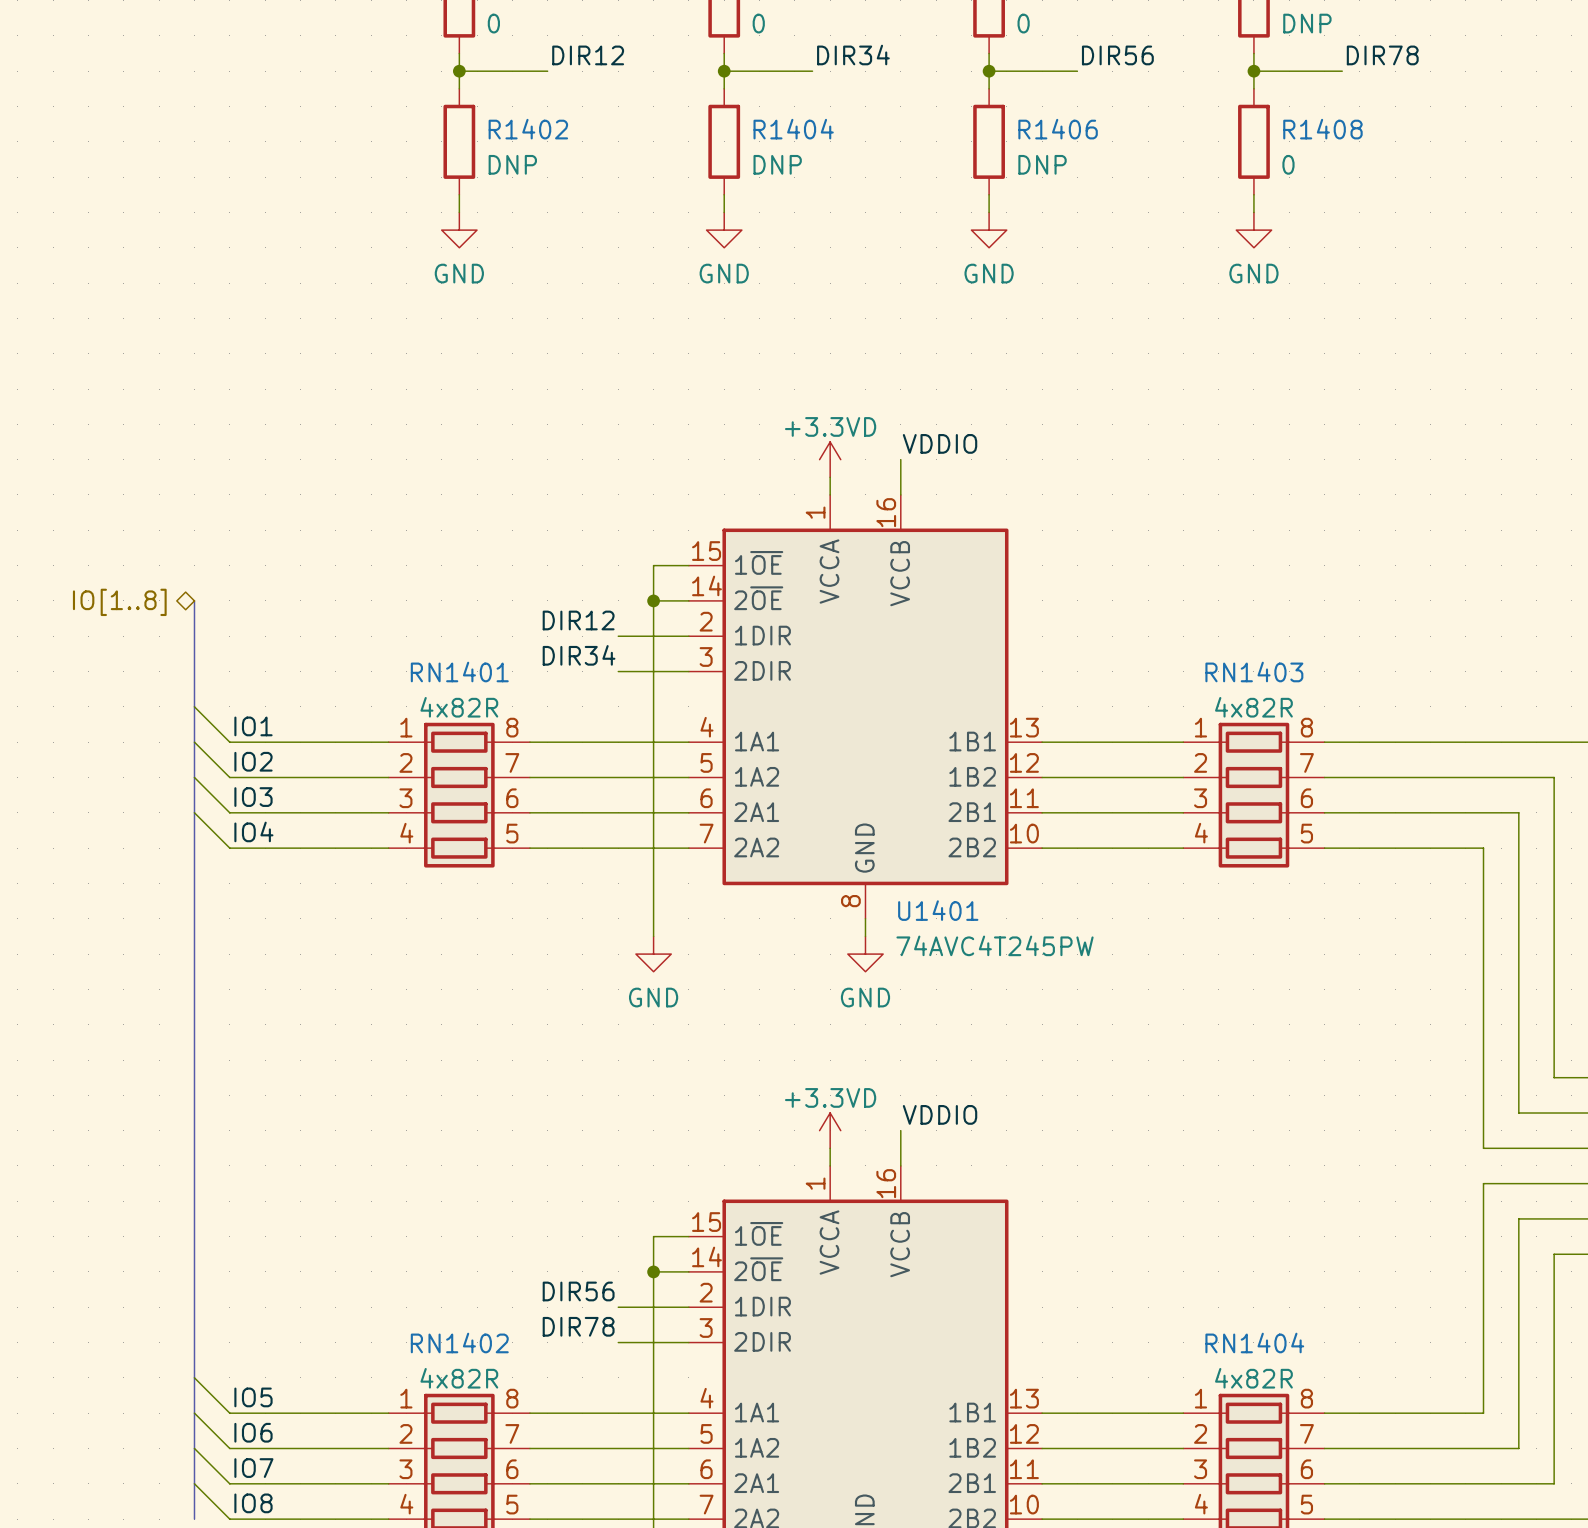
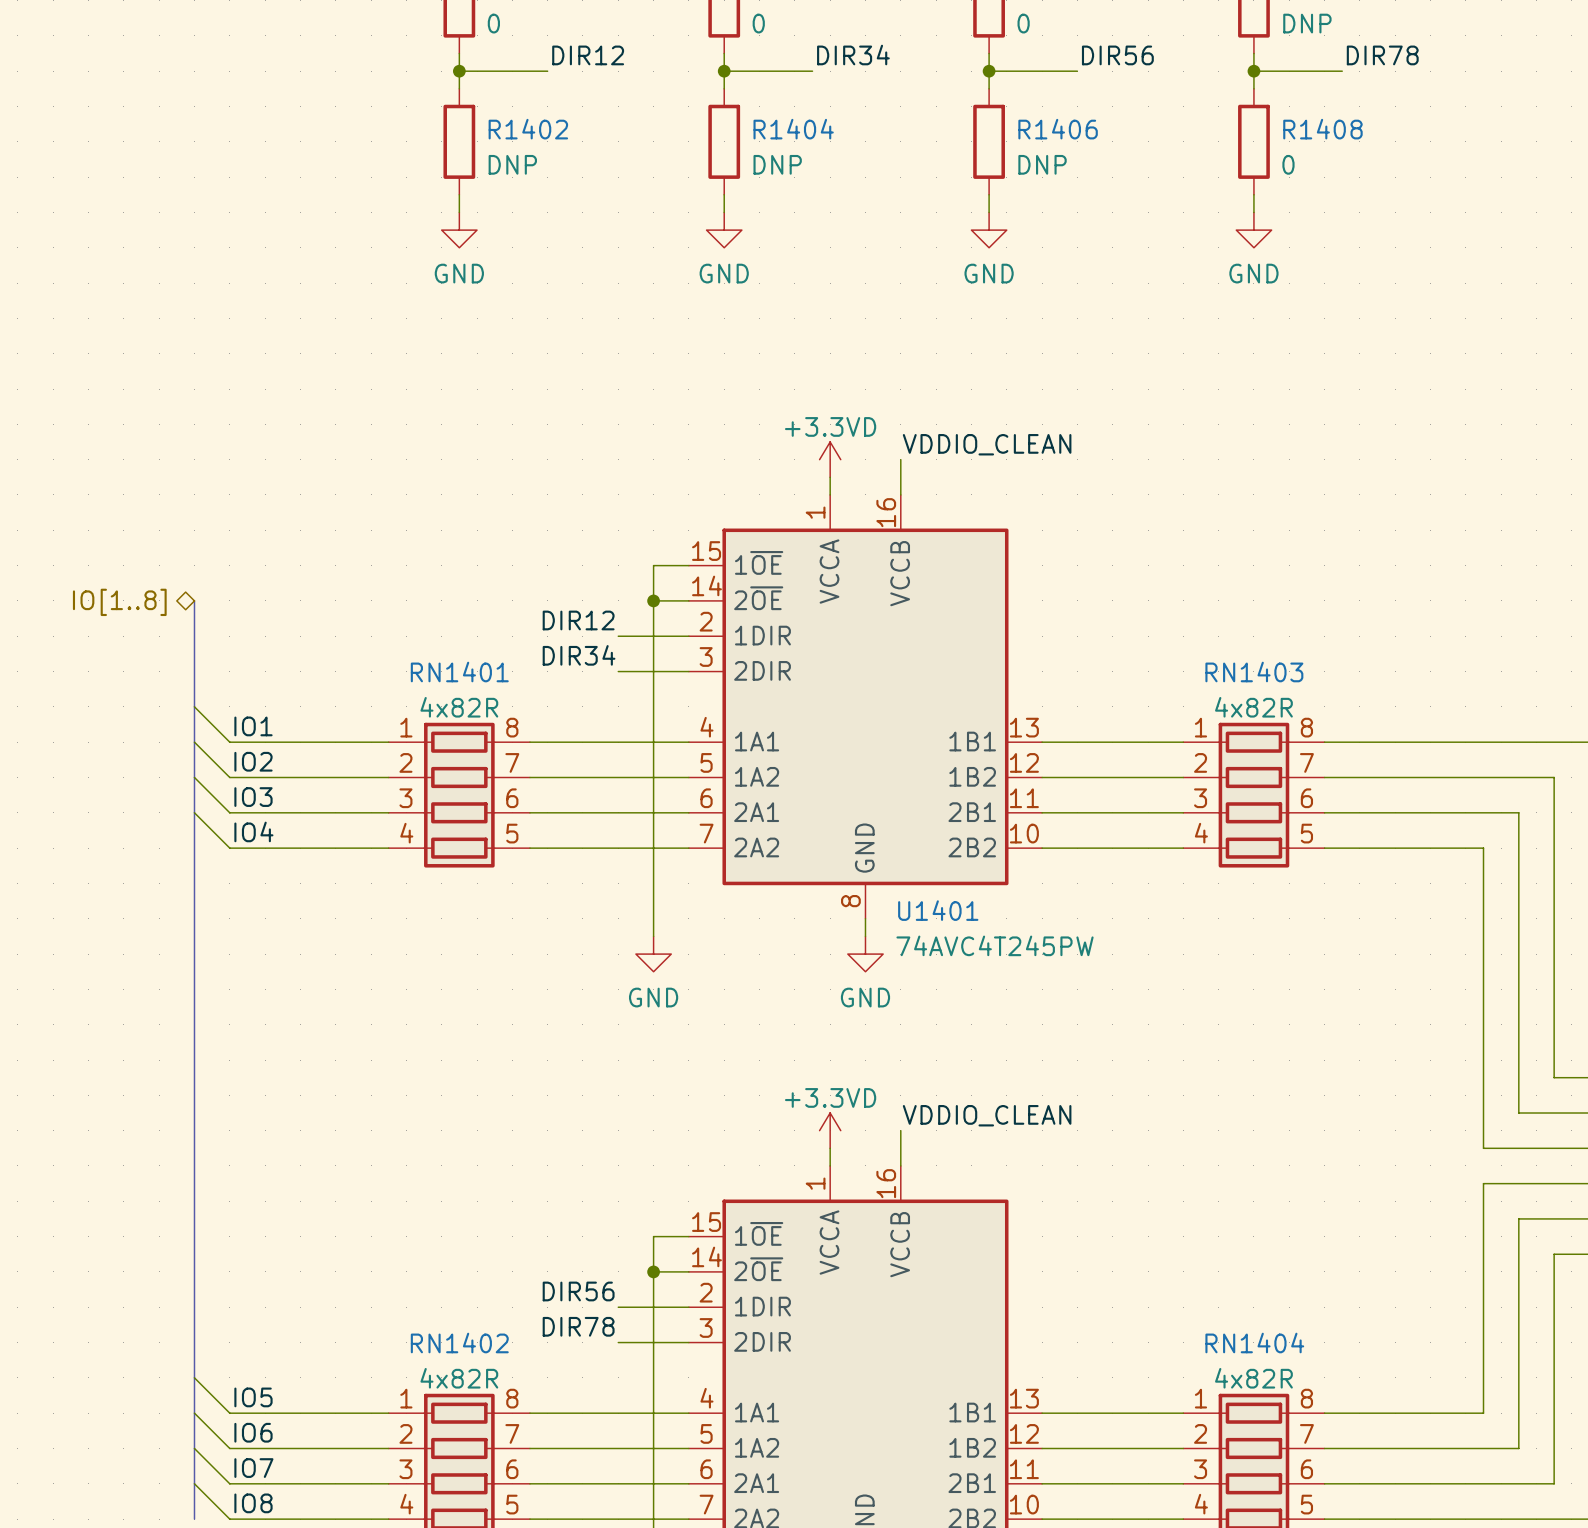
label: VDDIO (940, 443) -> VDDIO_CLEAN (987, 444)
label: VDDIO (940, 1114) -> VDDIO_CLEAN (987, 1115)

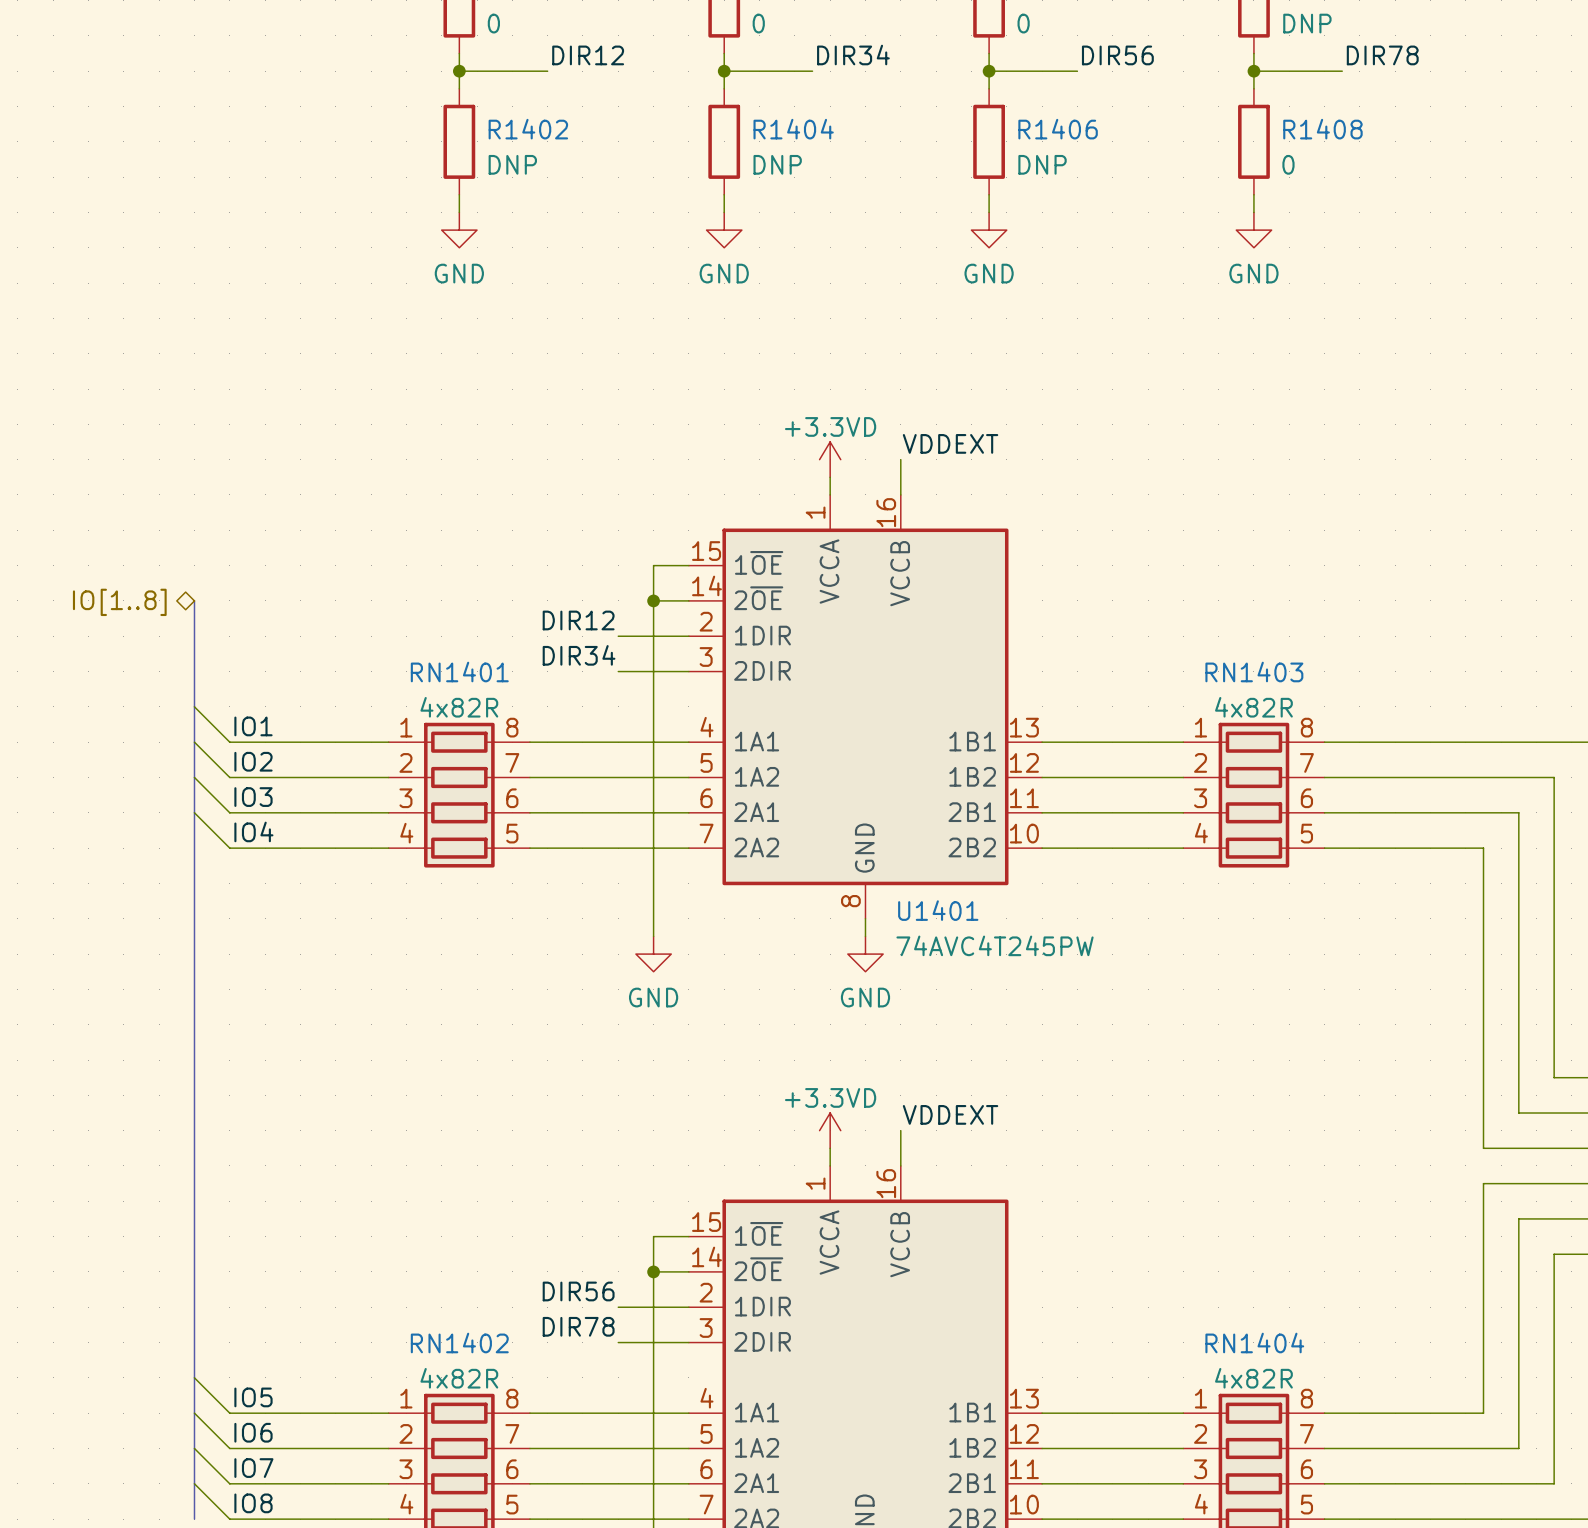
label: VDDIO_CLEAN (987, 444) -> VDDEXT (950, 443)
label: VDDIO_CLEAN (987, 1115) -> VDDEXT (950, 1114)

